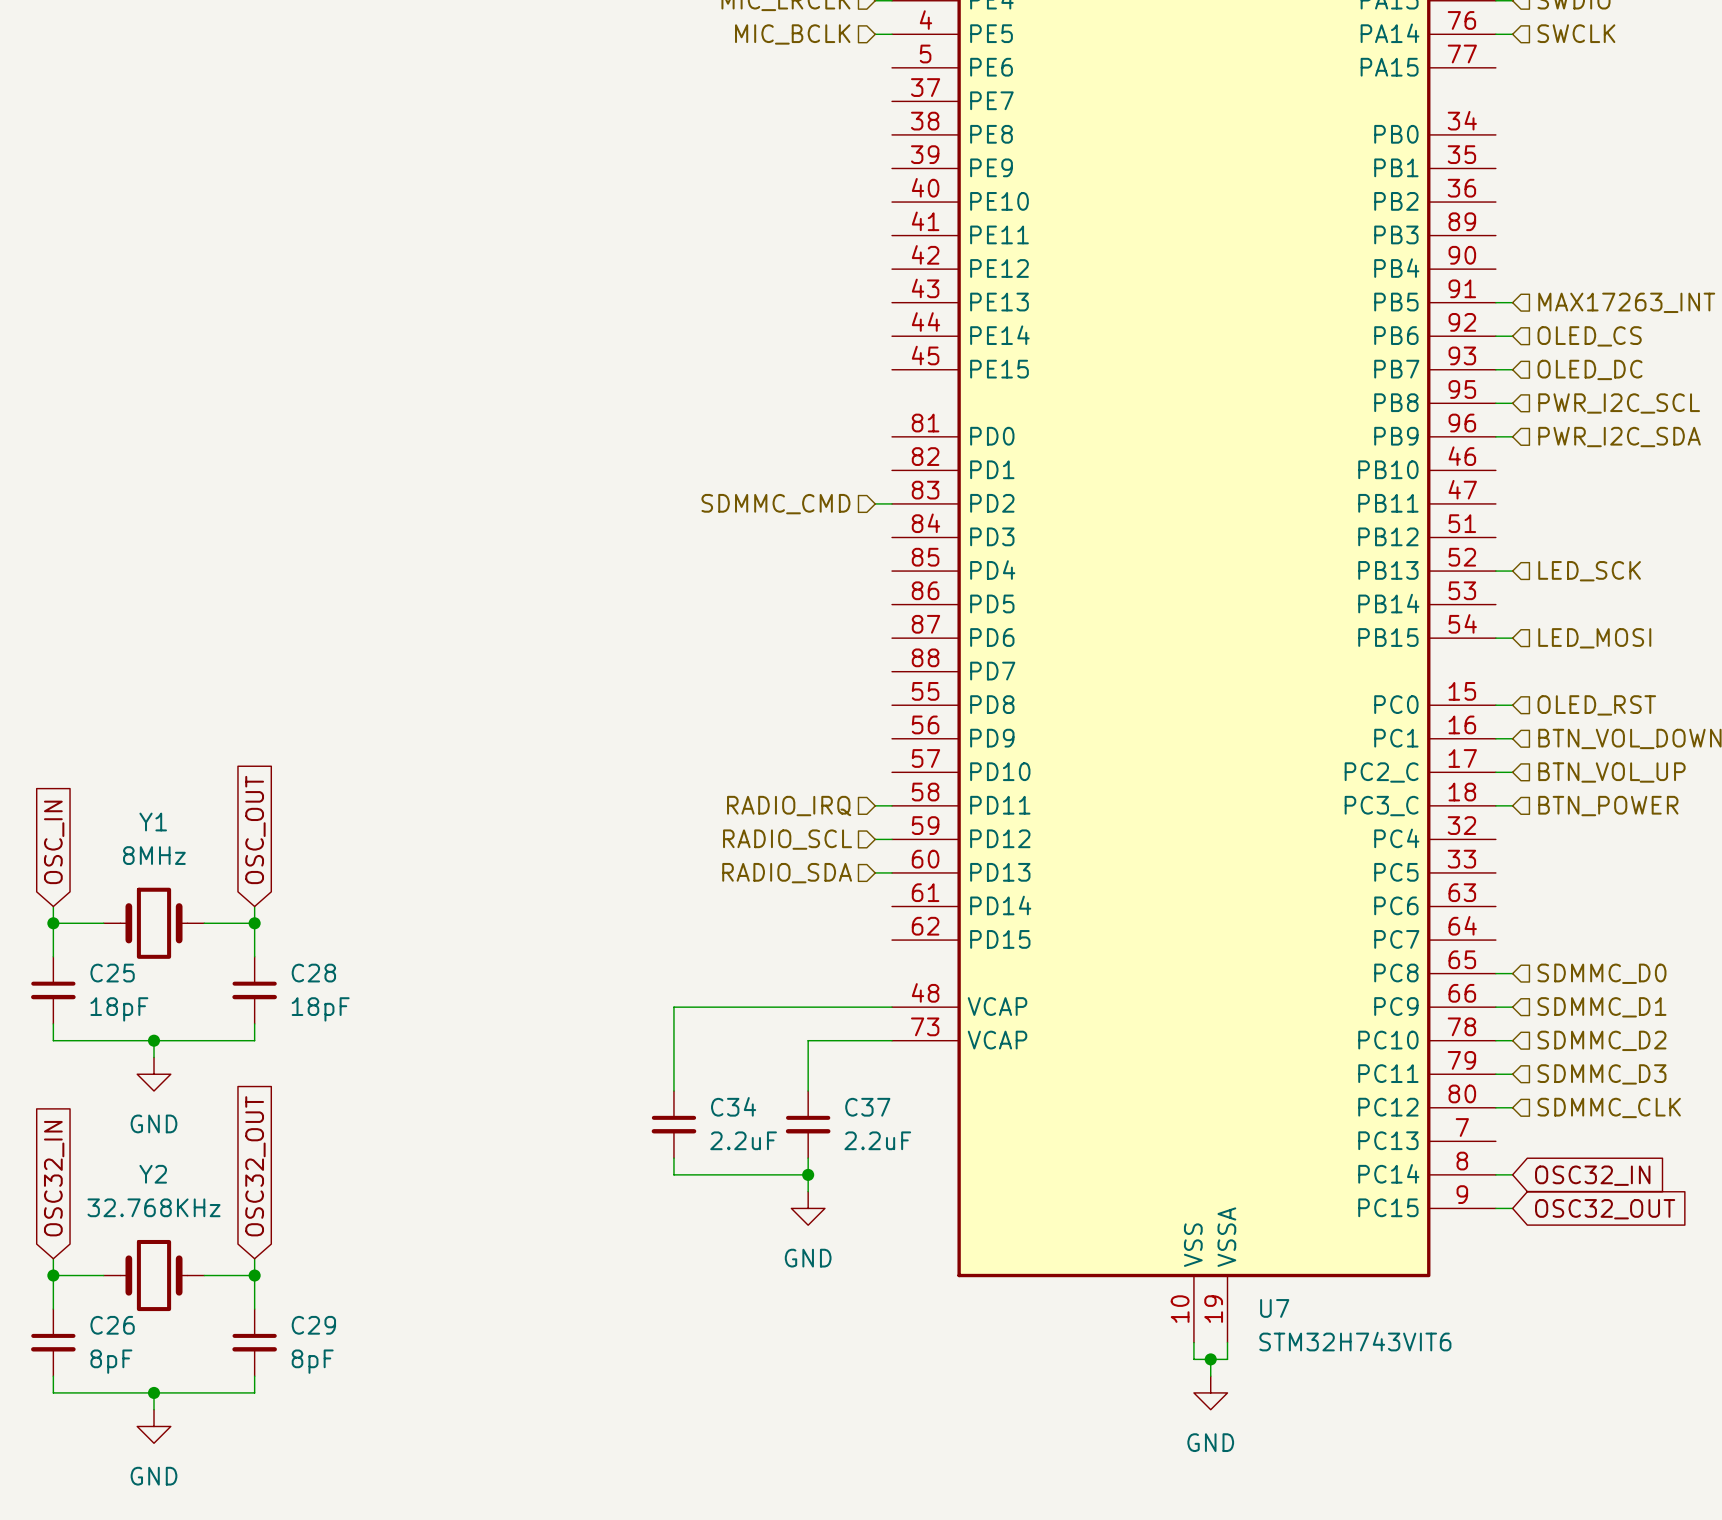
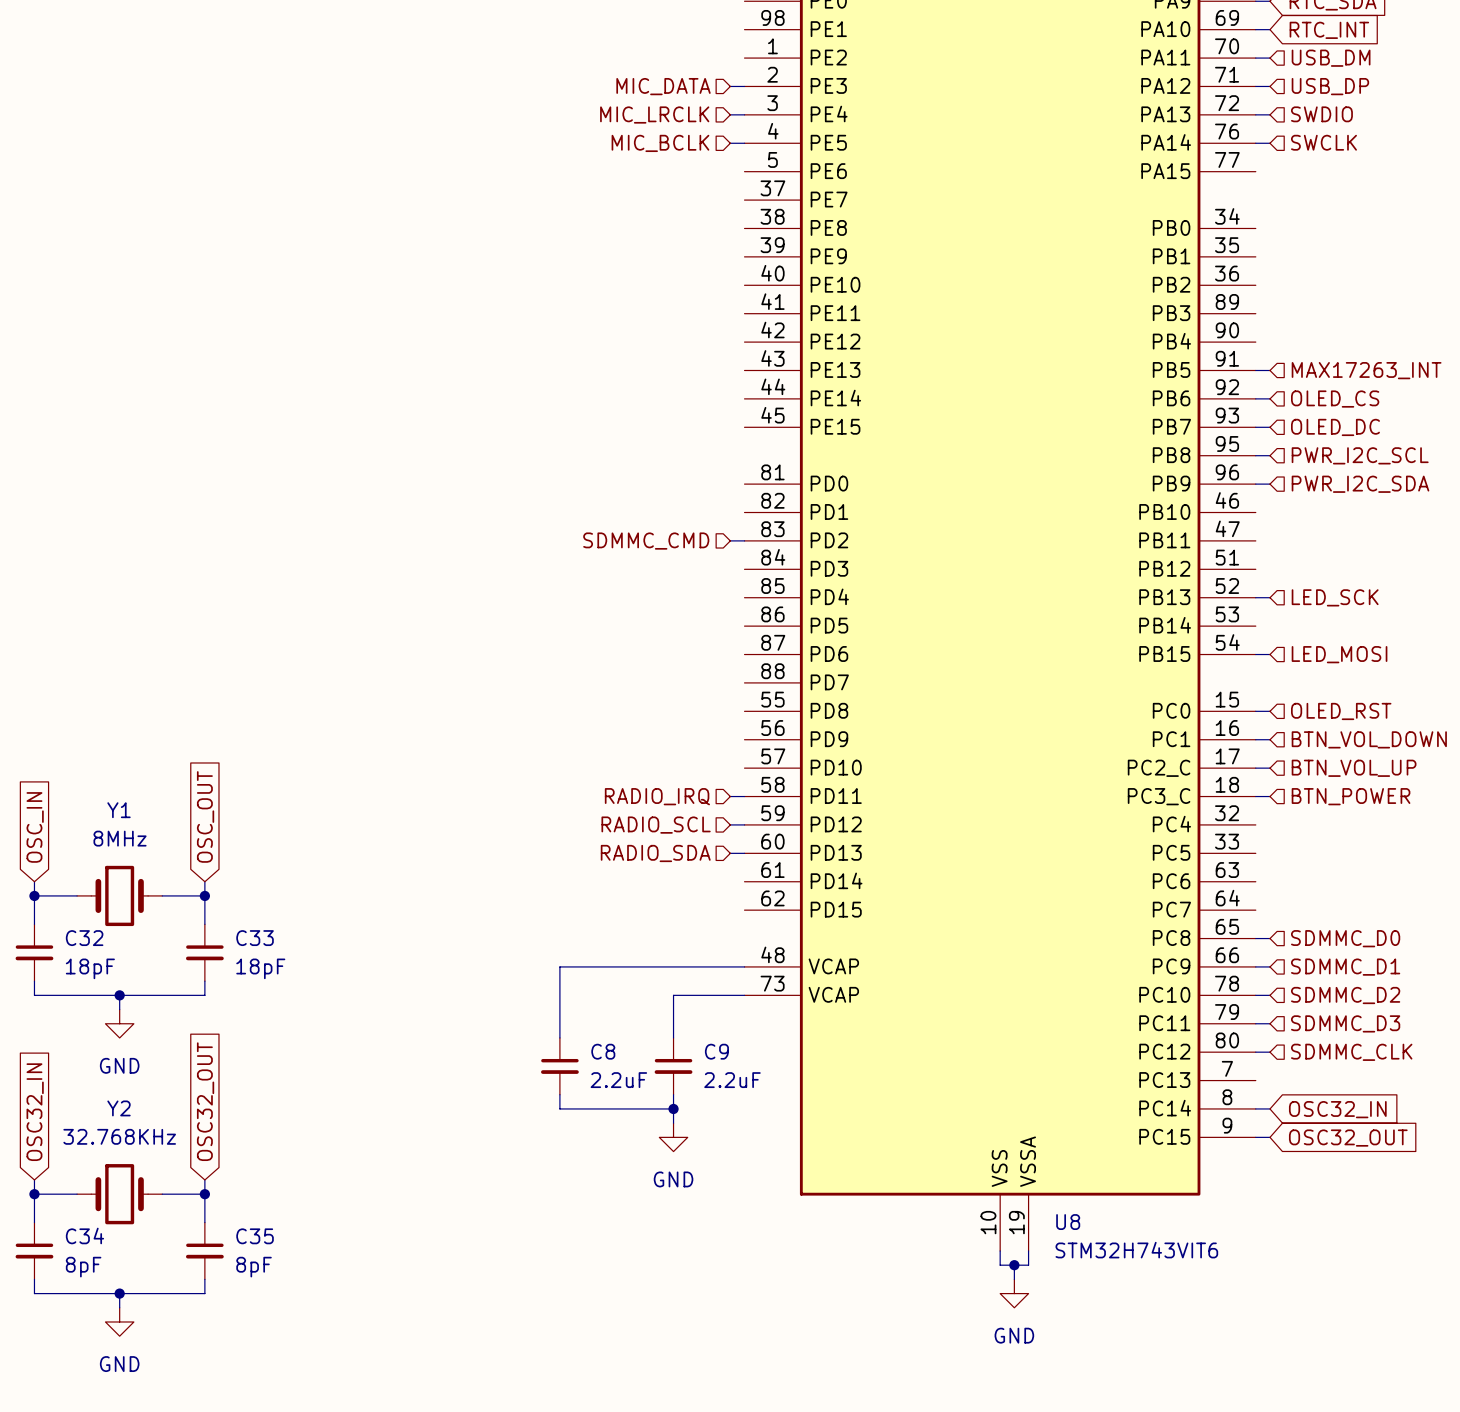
C25 name: C25 (112, 973) -> C32 (84, 938)
C28 name: C28 (313, 973) -> C33 (255, 938)
C34 name: C34 (733, 1106) -> C8 (603, 1051)
C37 name: C37 (867, 1107) -> C9 (716, 1051)
U7 name: U7 (1274, 1308) -> U8 (1068, 1222)
C26 name: C26 (112, 1325) -> C34 (84, 1235)
C29 name: C29 (313, 1325) -> C35 (255, 1236)

